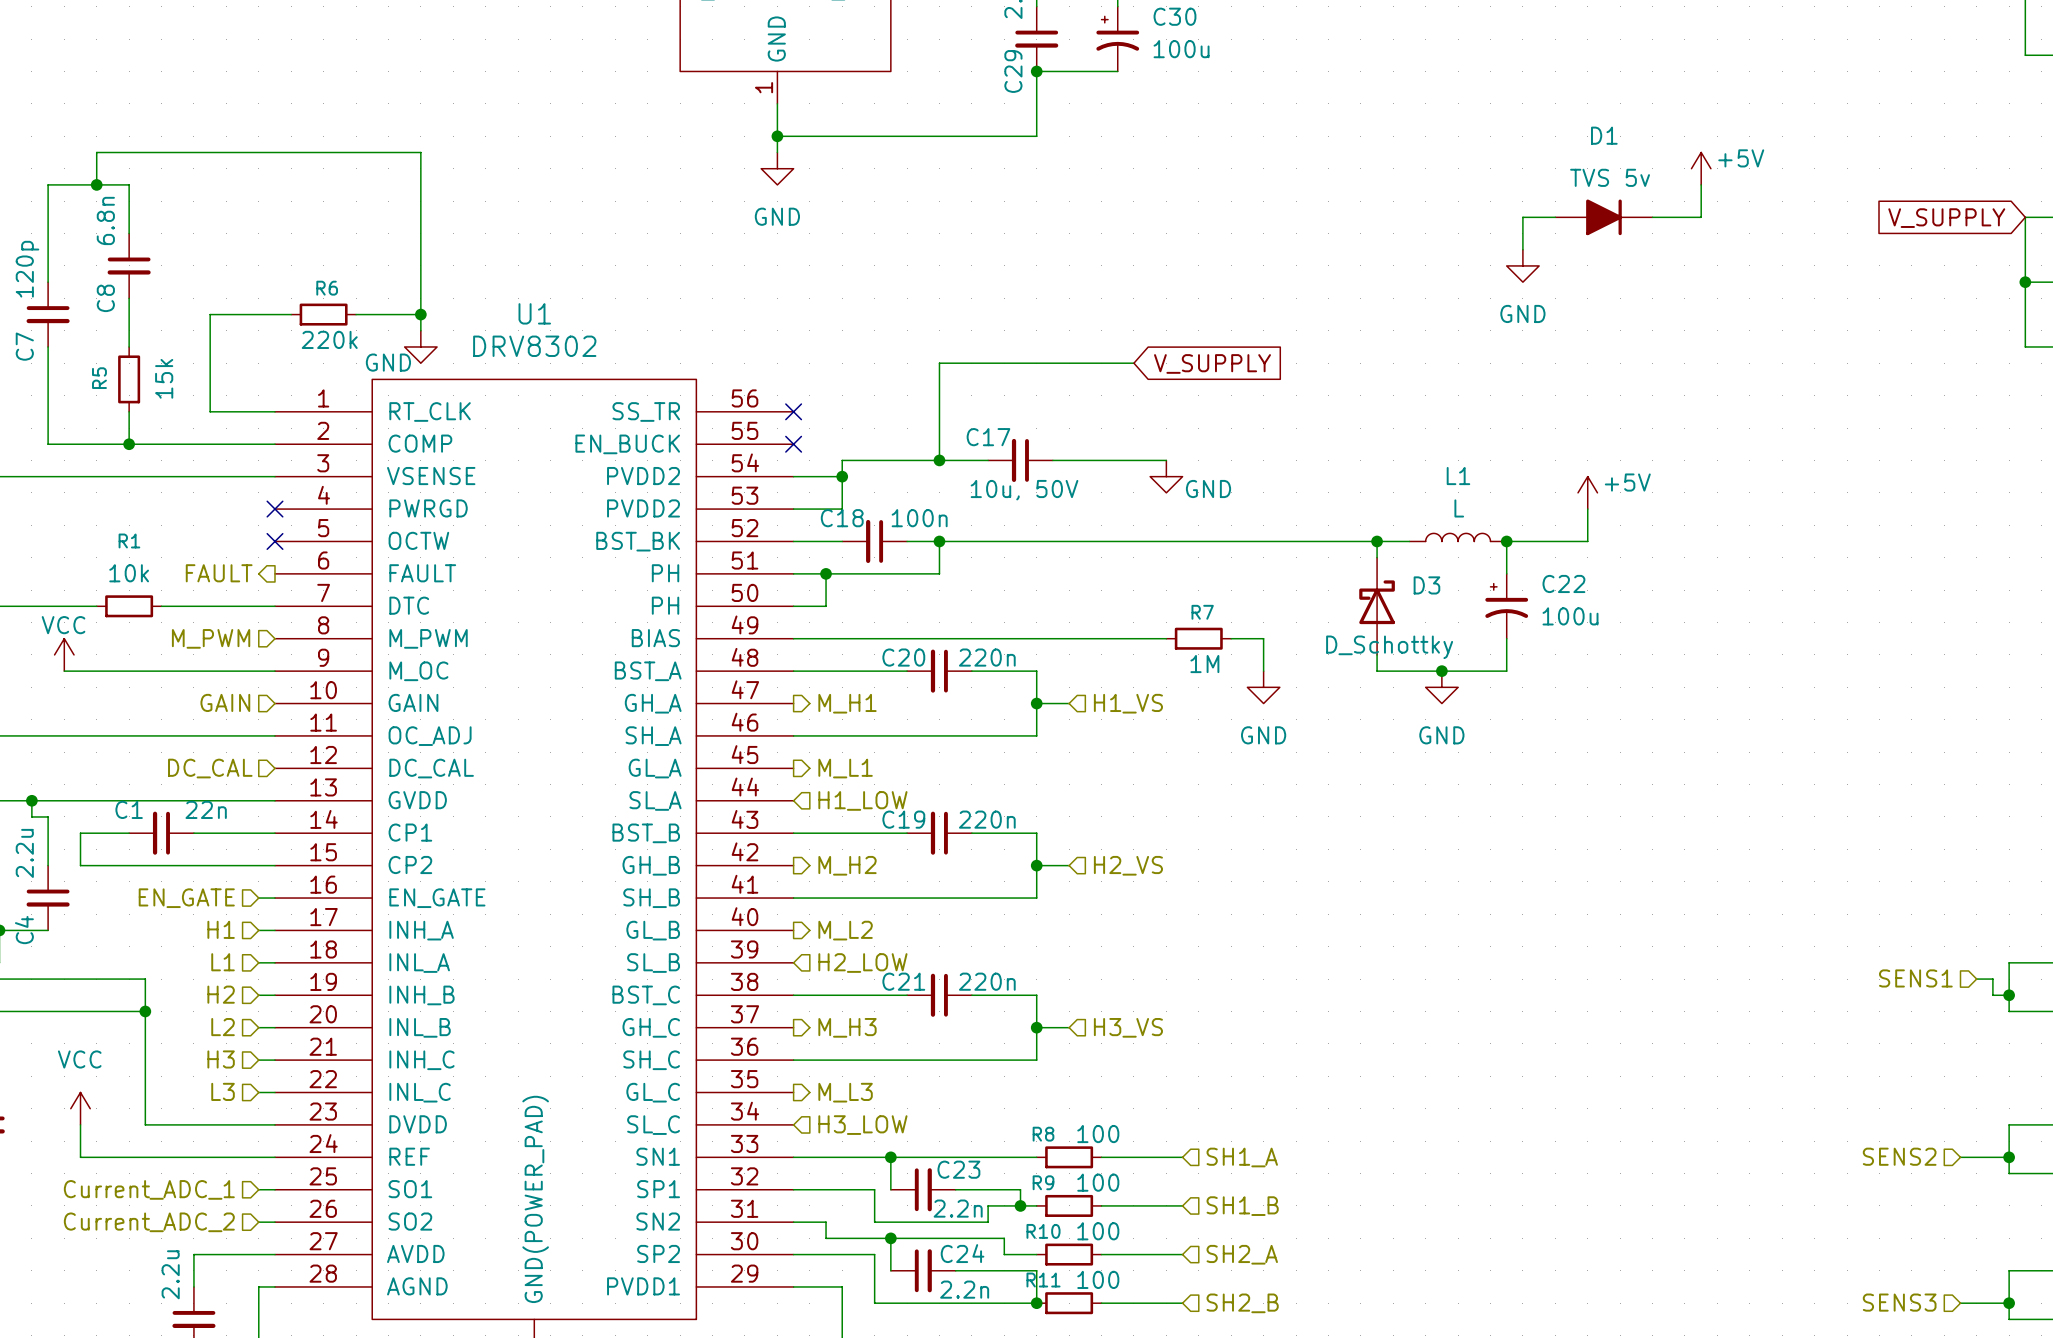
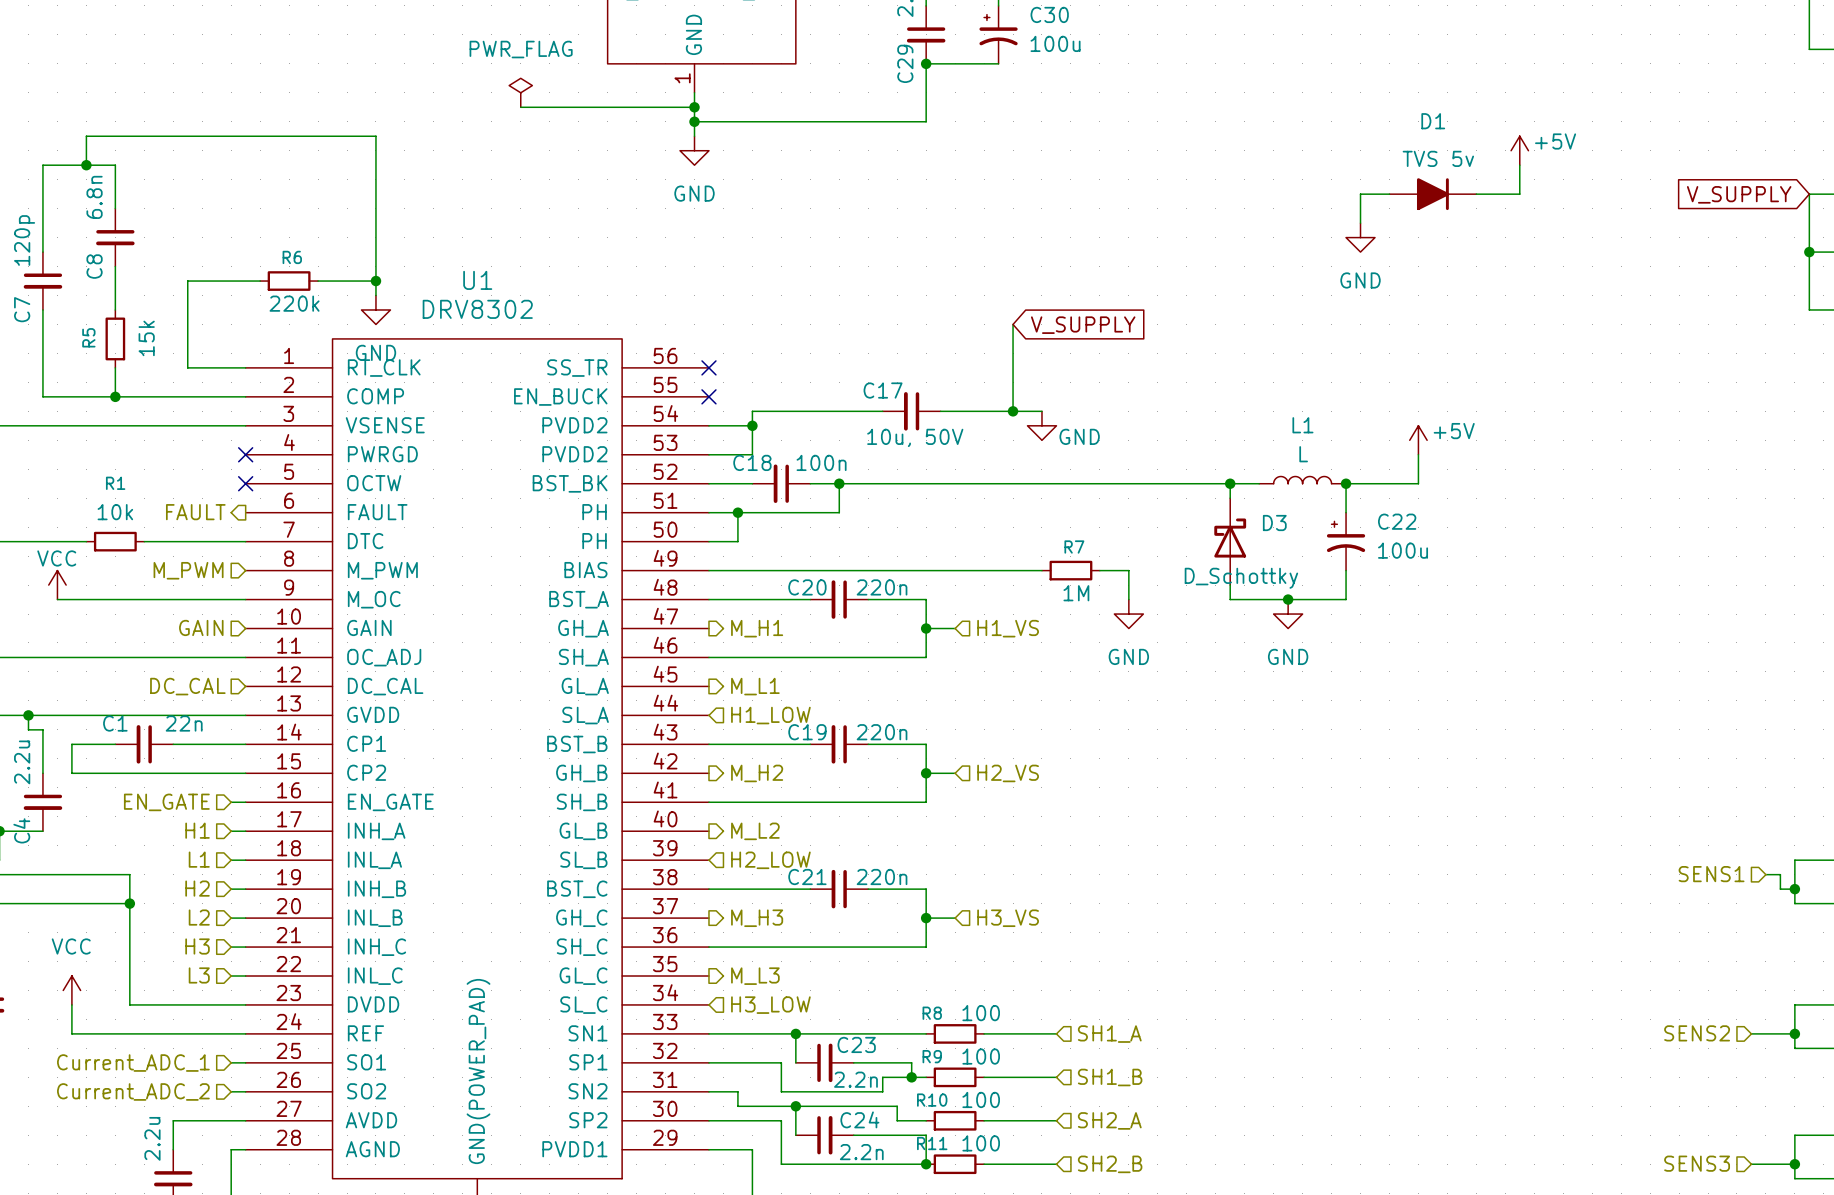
power symbol: none -> PWR_FLAG (520, 92)
wire: none -> (520, 107) (694, 107)
junction: none -> (694, 107)
power symbol text position: GND (388, 362) -> GND (375, 352)
wire: (1133, 363) (939, 363) (939, 460) -> (1013, 324) (1013, 411)
junction: (939, 460) -> none
junction: none -> (1013, 411)

